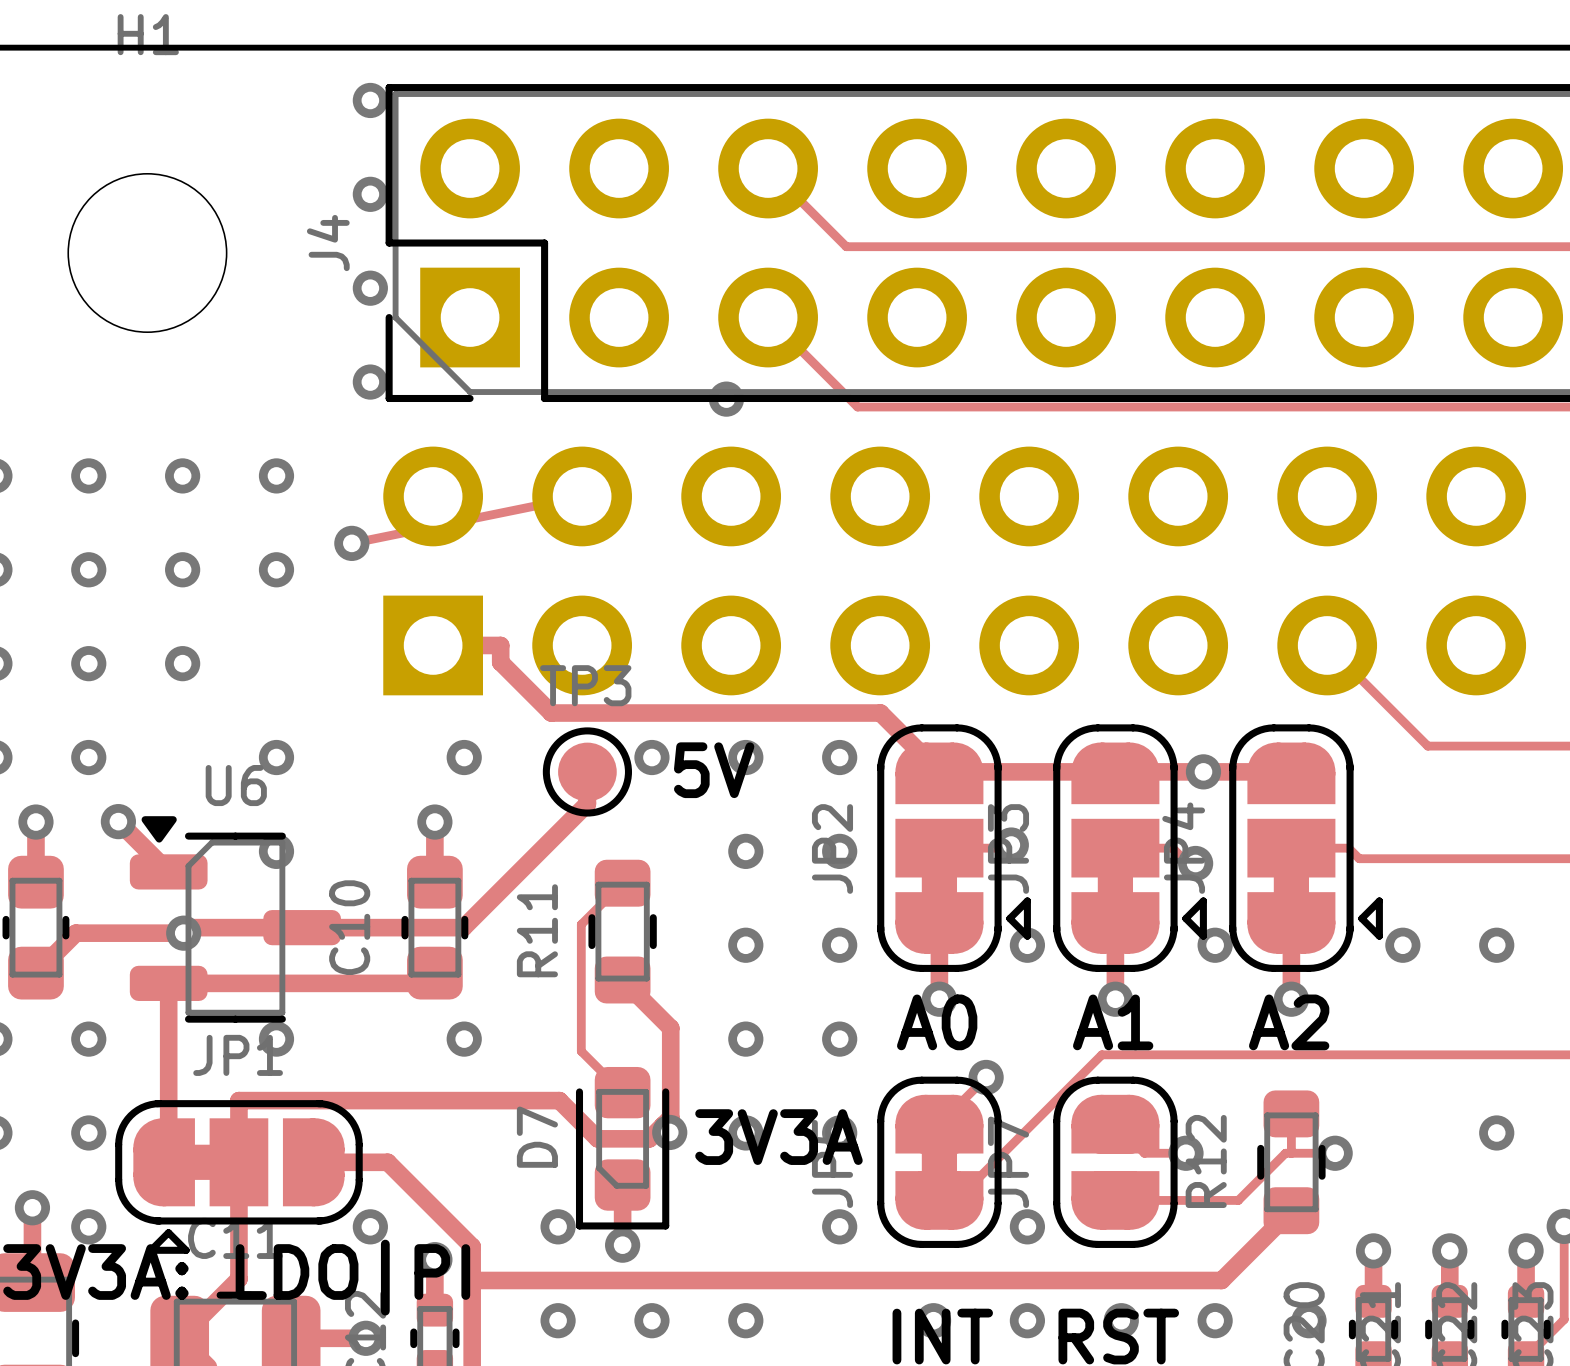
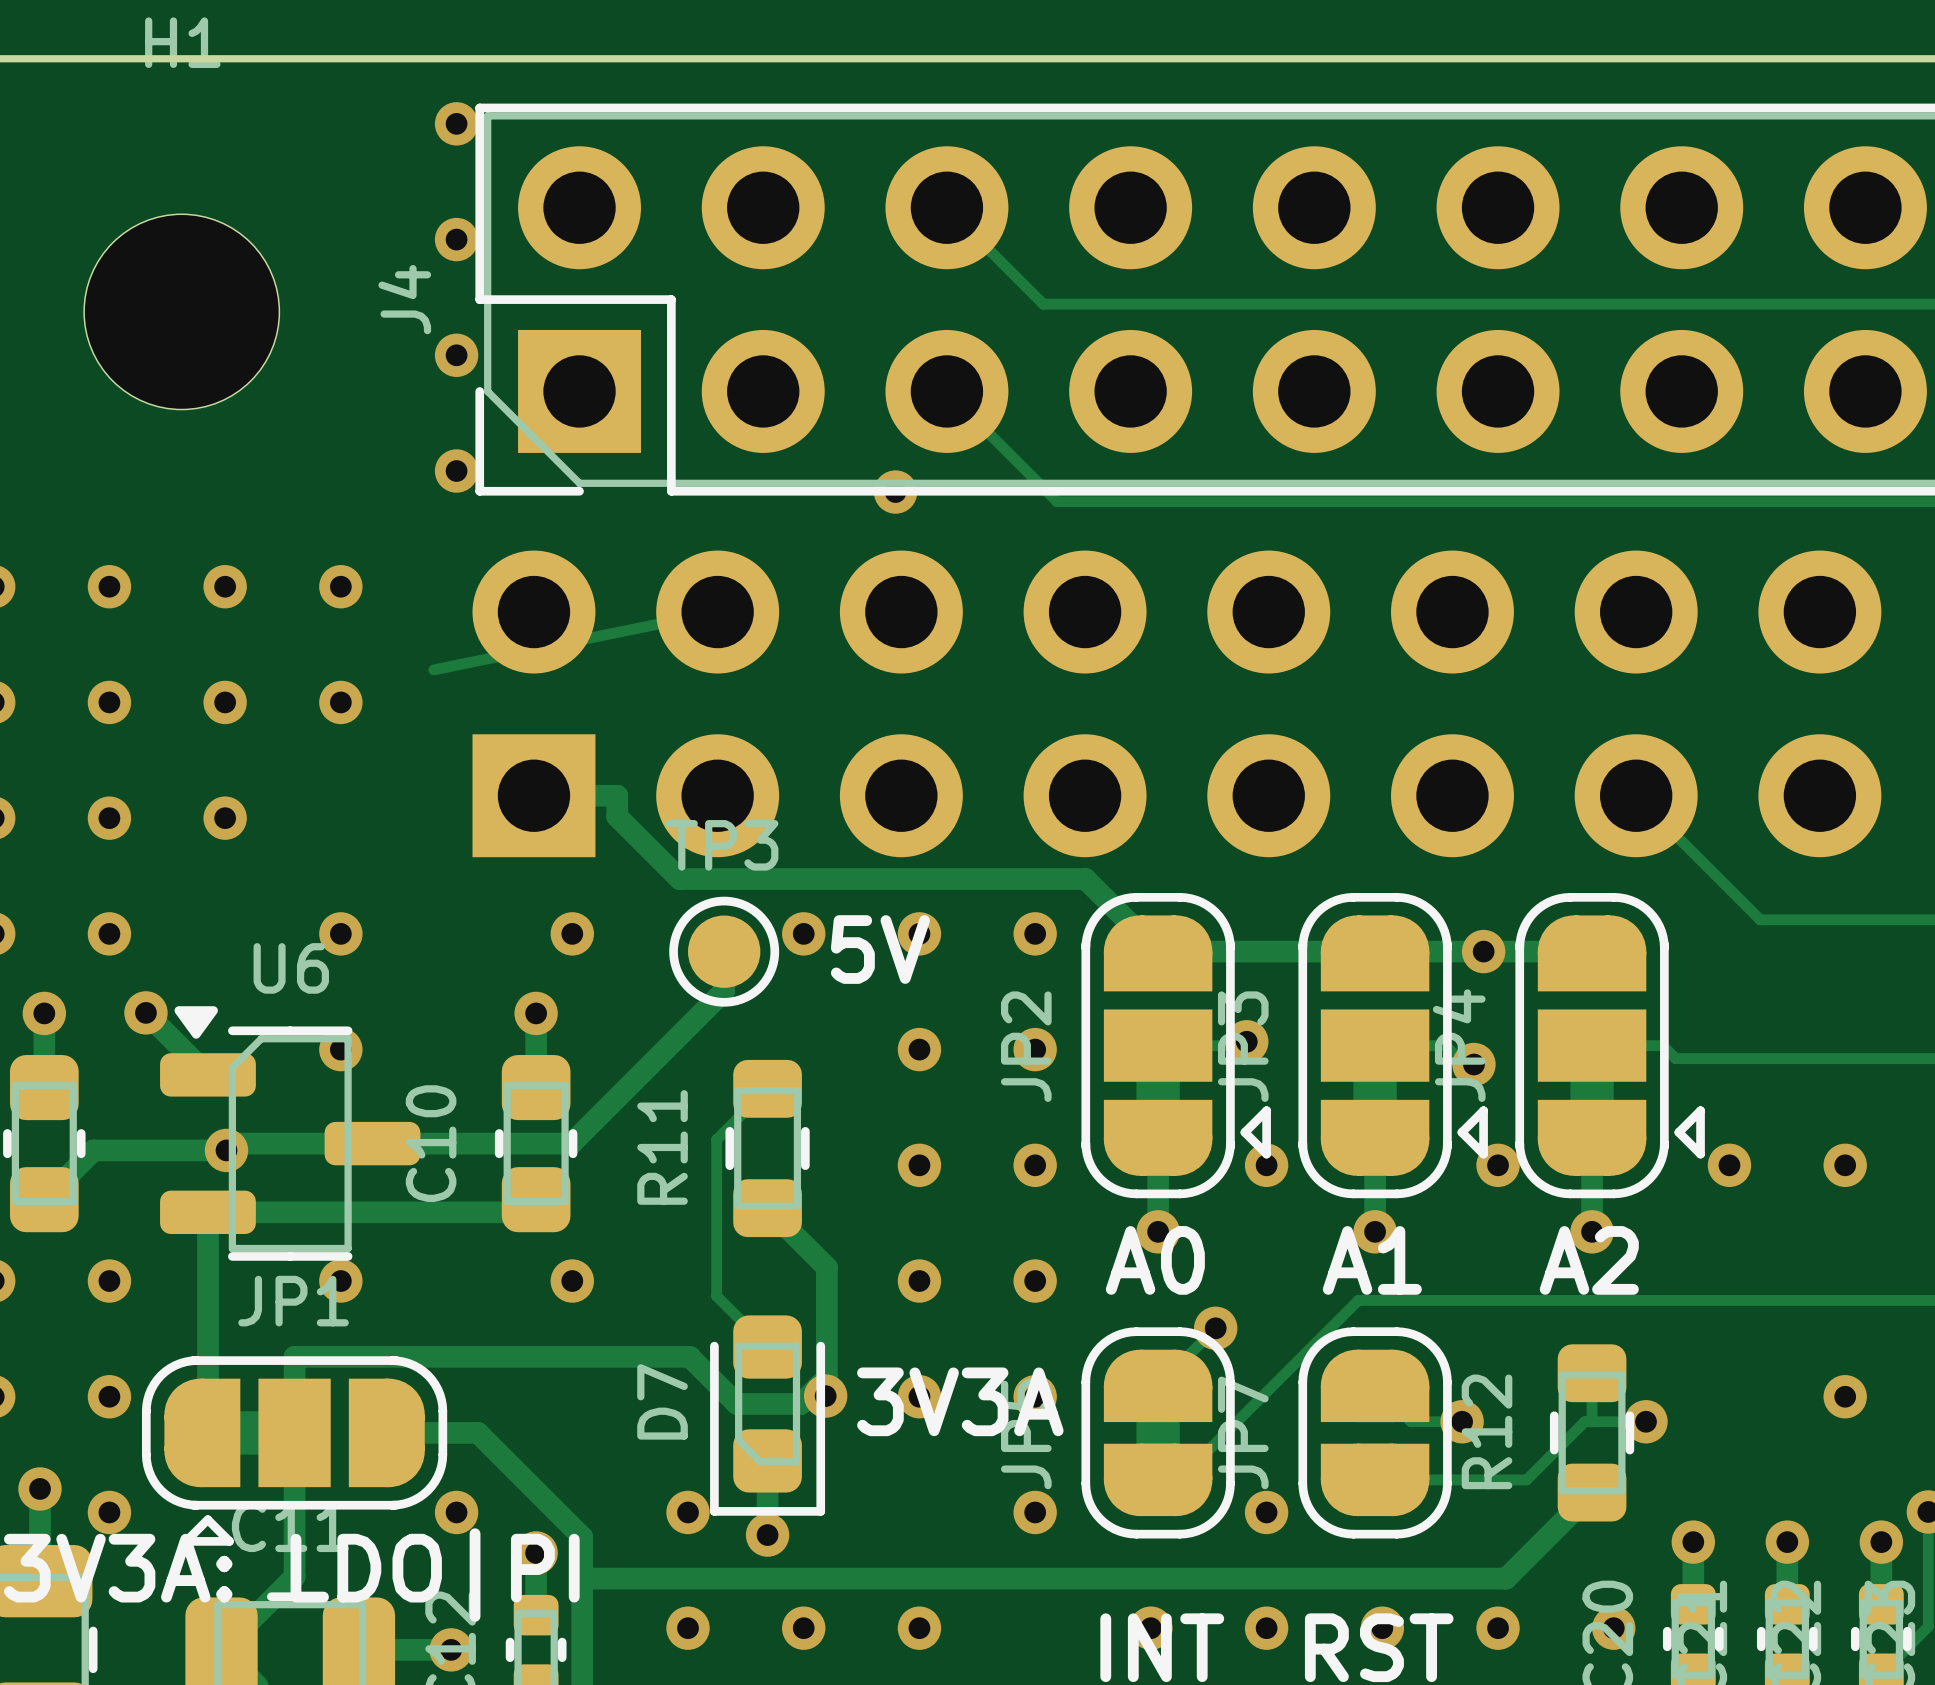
via: (351, 543) -> none

